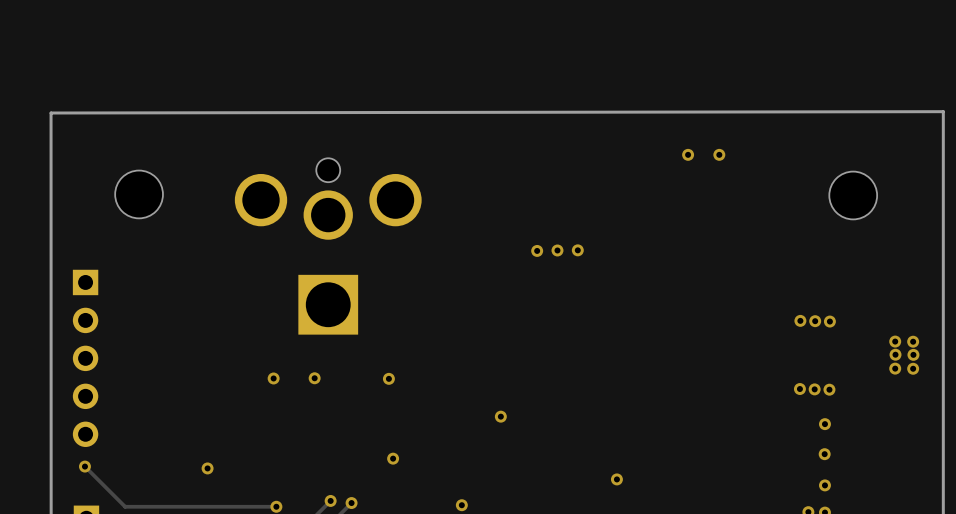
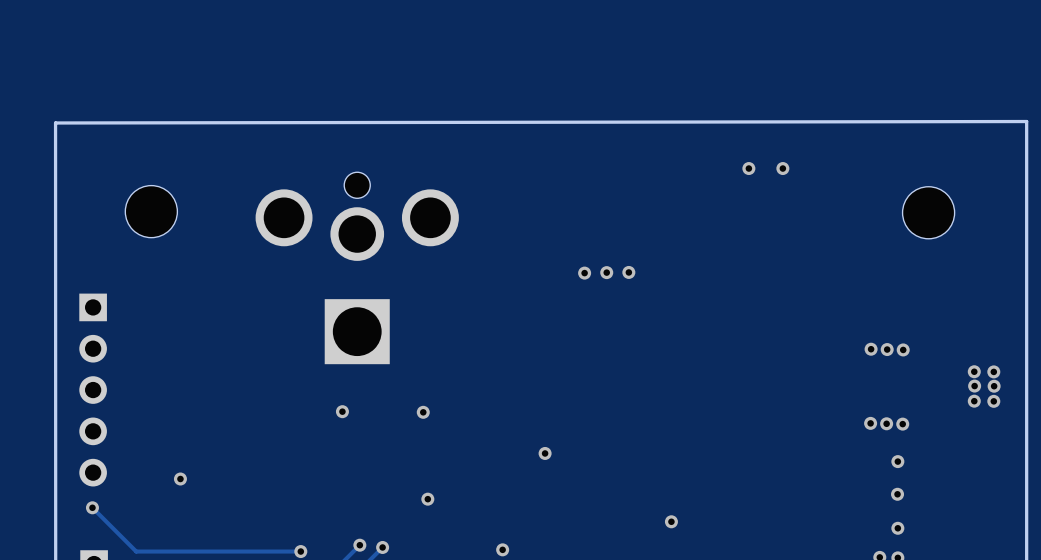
via: (273, 378) -> none
via position: (207, 468) -> (180, 479)

